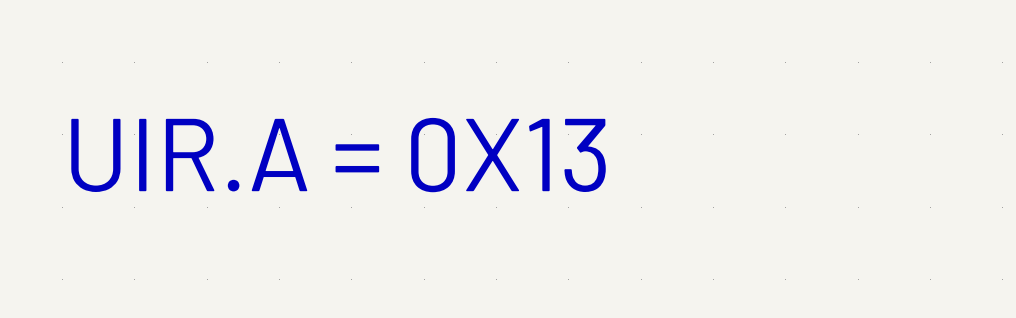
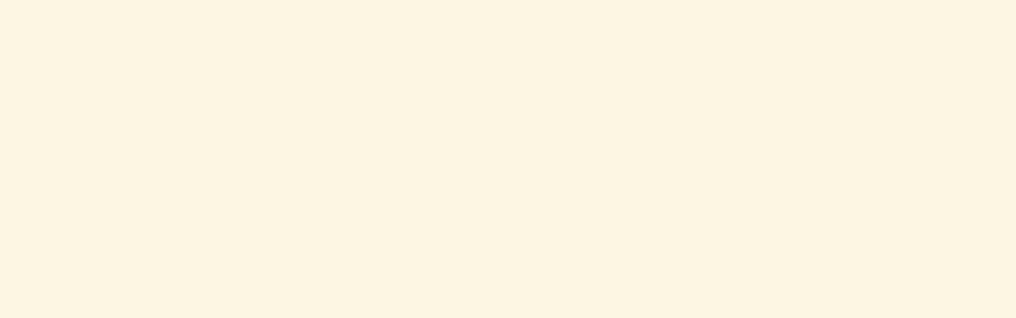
text: UIR.A = 0X13 (338, 155) -> none

